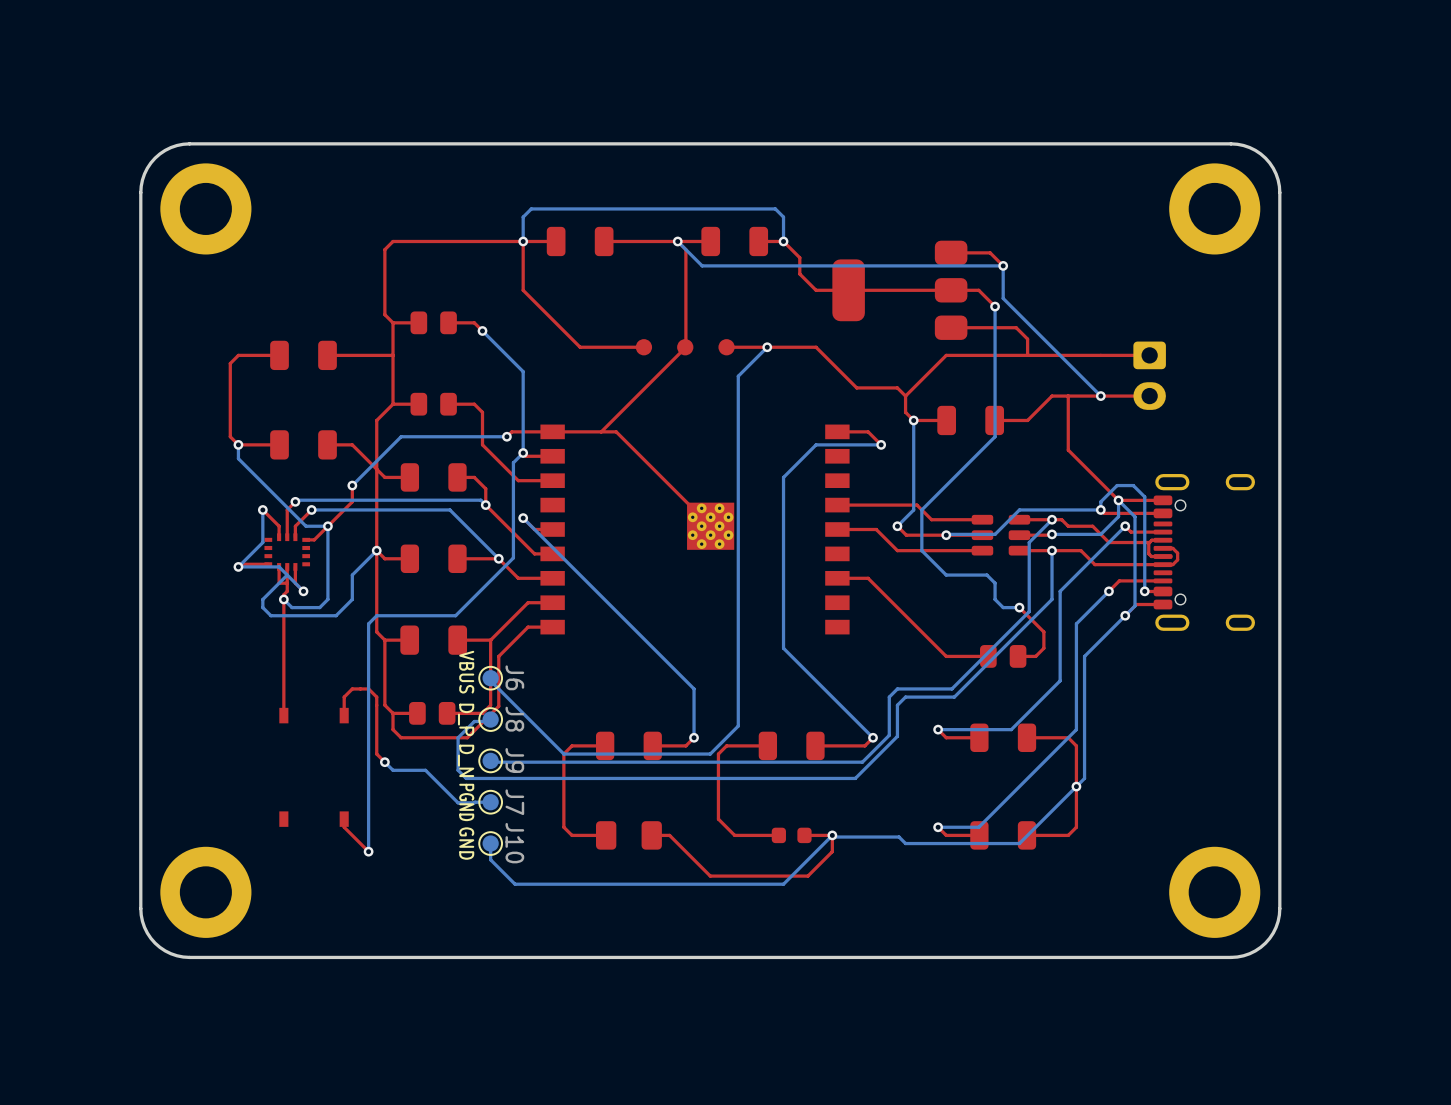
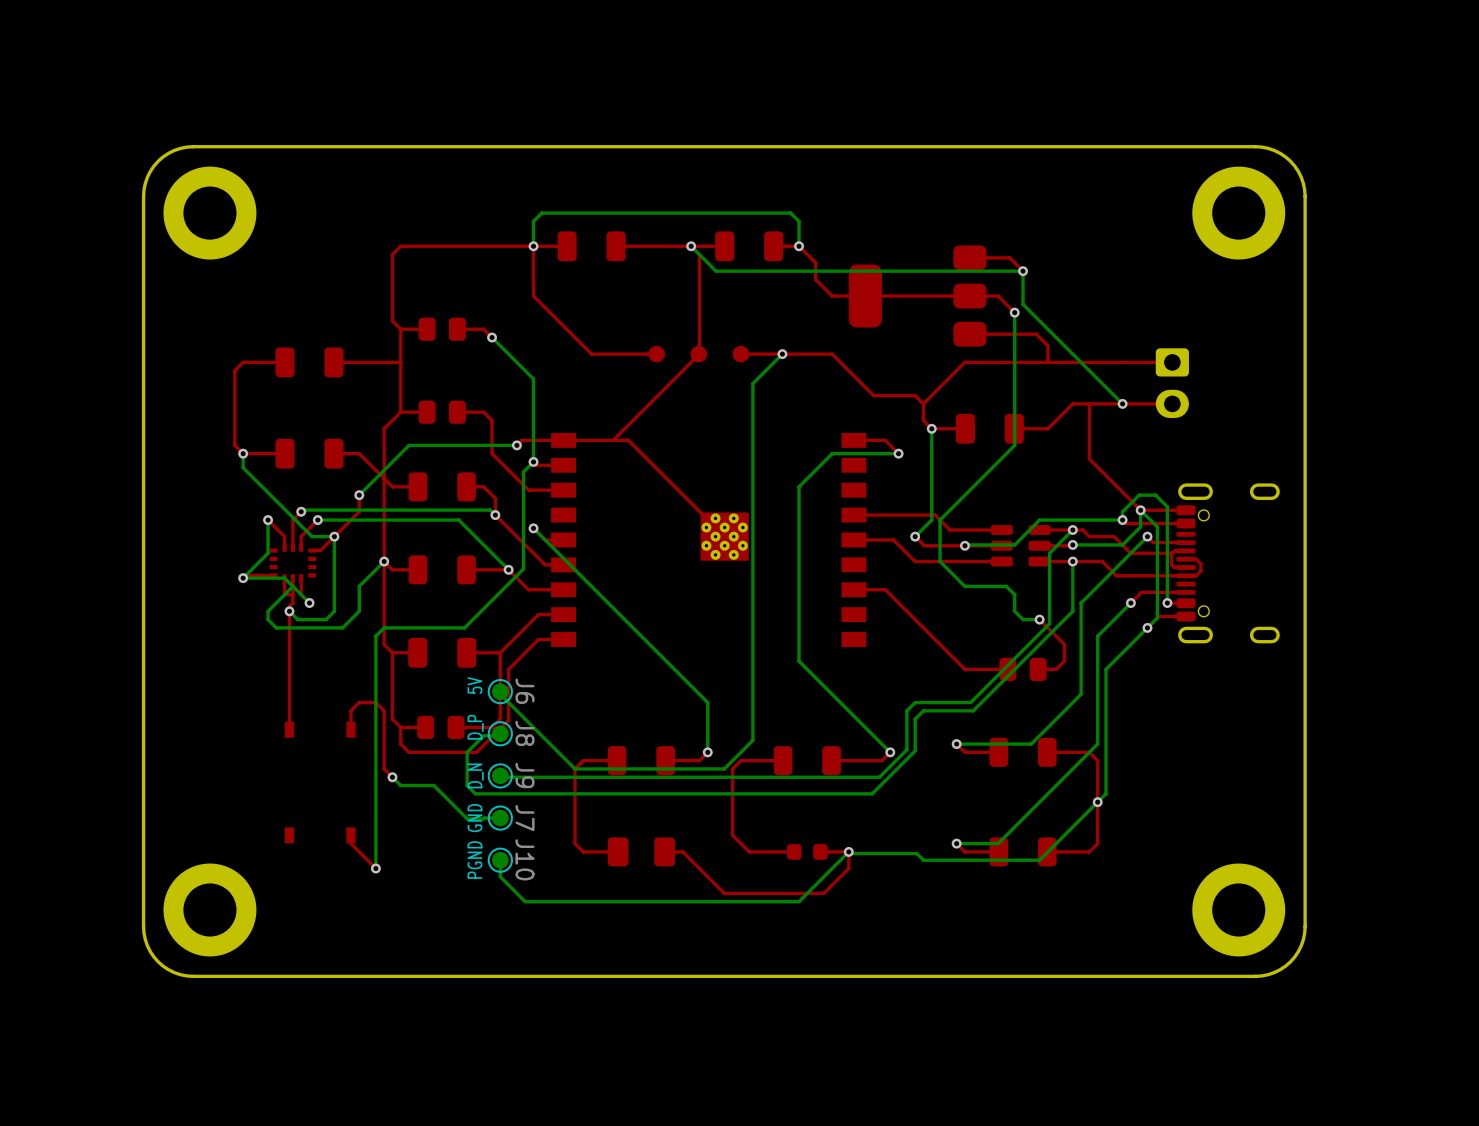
J6 text: none -> 5V (474, 685)
J6 text: VBUS (466, 672) -> none
J8 text: none -> D_P (475, 727)
J8 text: D_P (466, 719) -> none
J9 text: none -> D_N (475, 775)
J9 text: D_N (466, 760) -> none
J7 text: none -> GND (474, 818)
J7 text: PGND (466, 802) -> none
J10 text: none -> PGND (474, 859)
J10 text: GND (466, 843) -> none

